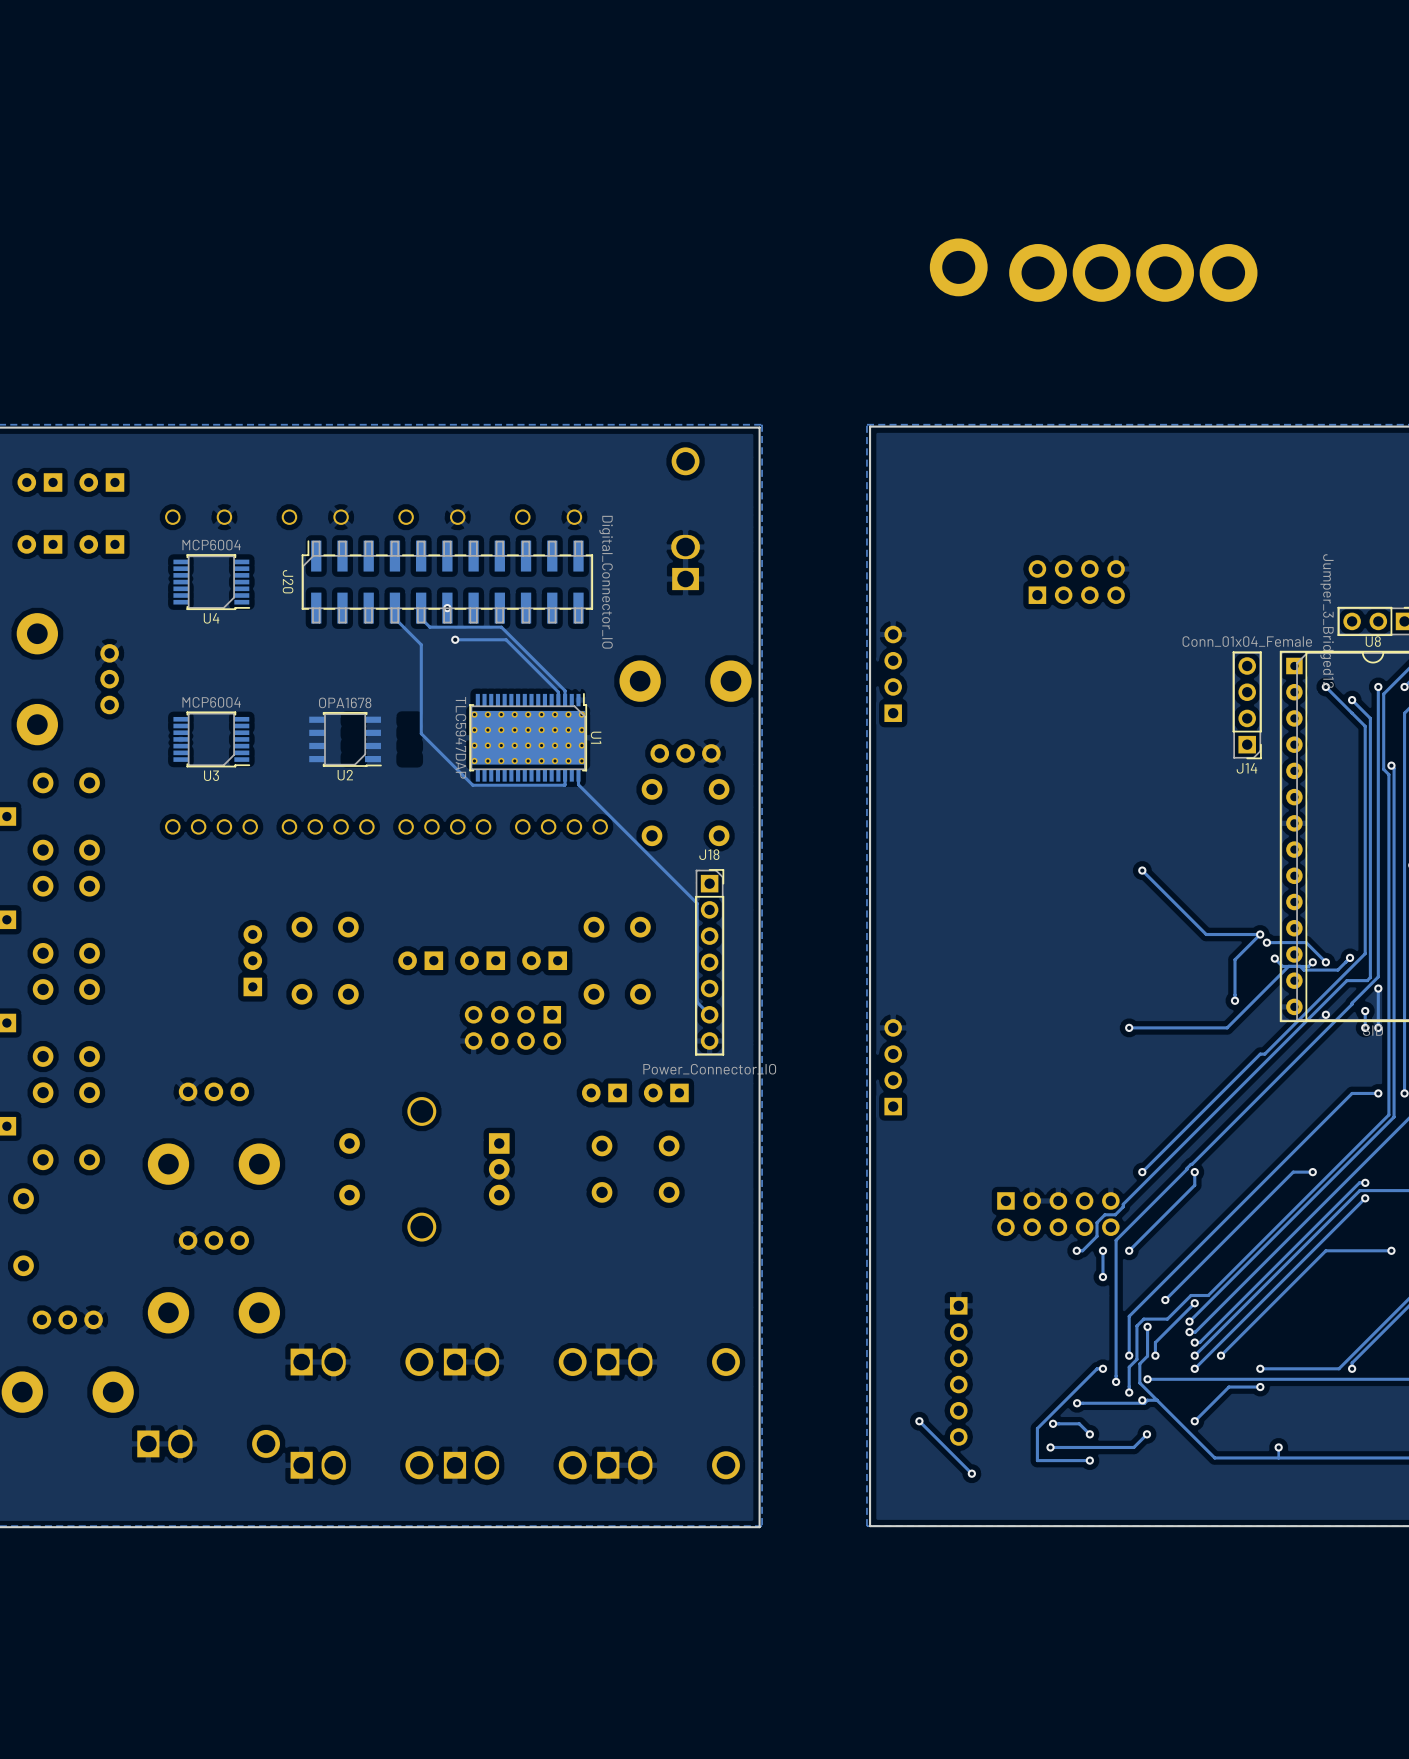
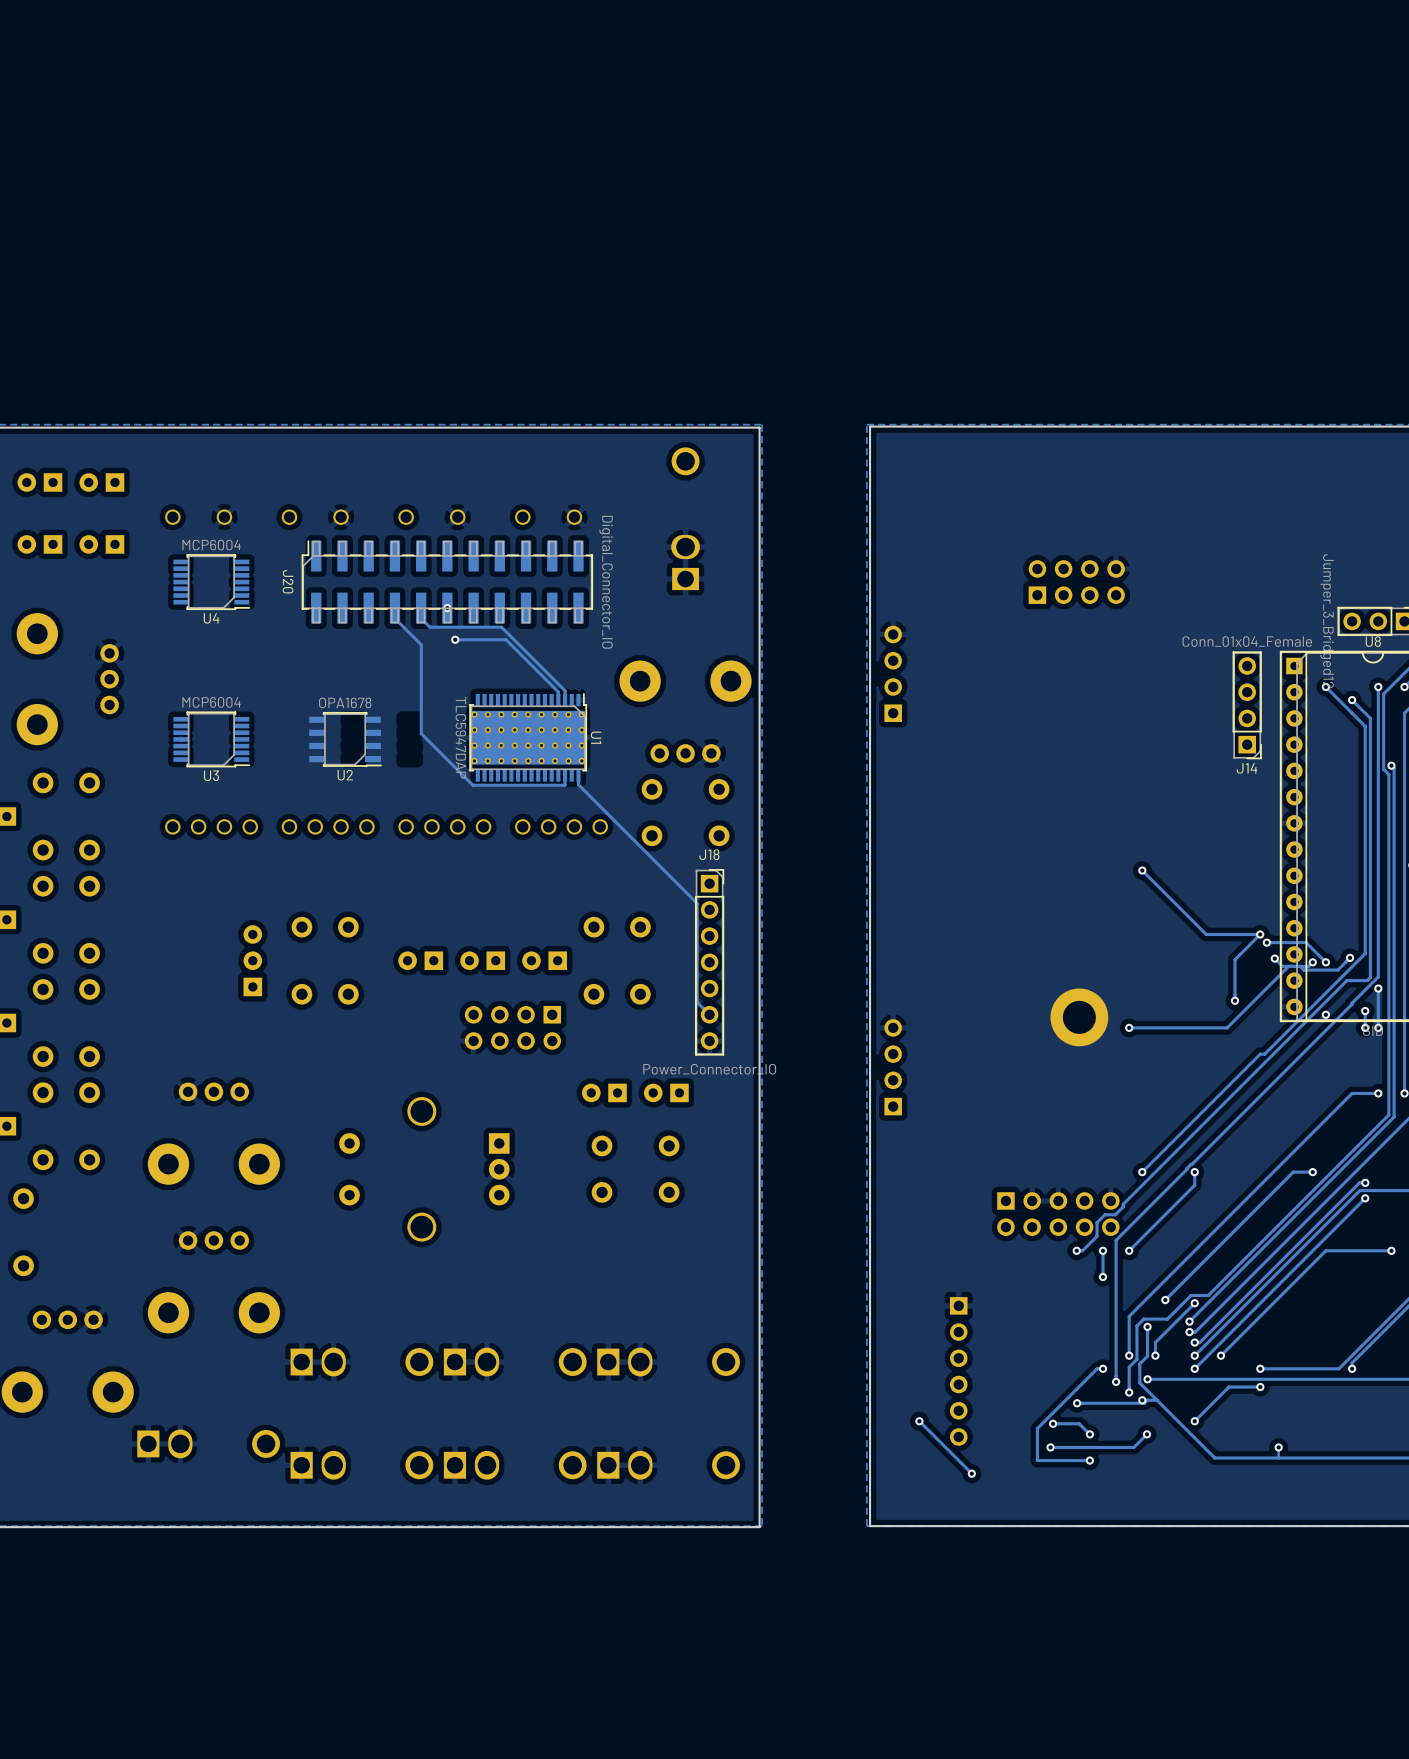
part: (958, 267) -> none
part: (1038, 272) -> none
part: (1101, 272) -> none
part: (1165, 272) -> none
part: (1228, 272) -> none
part: none -> (1079, 1017)

